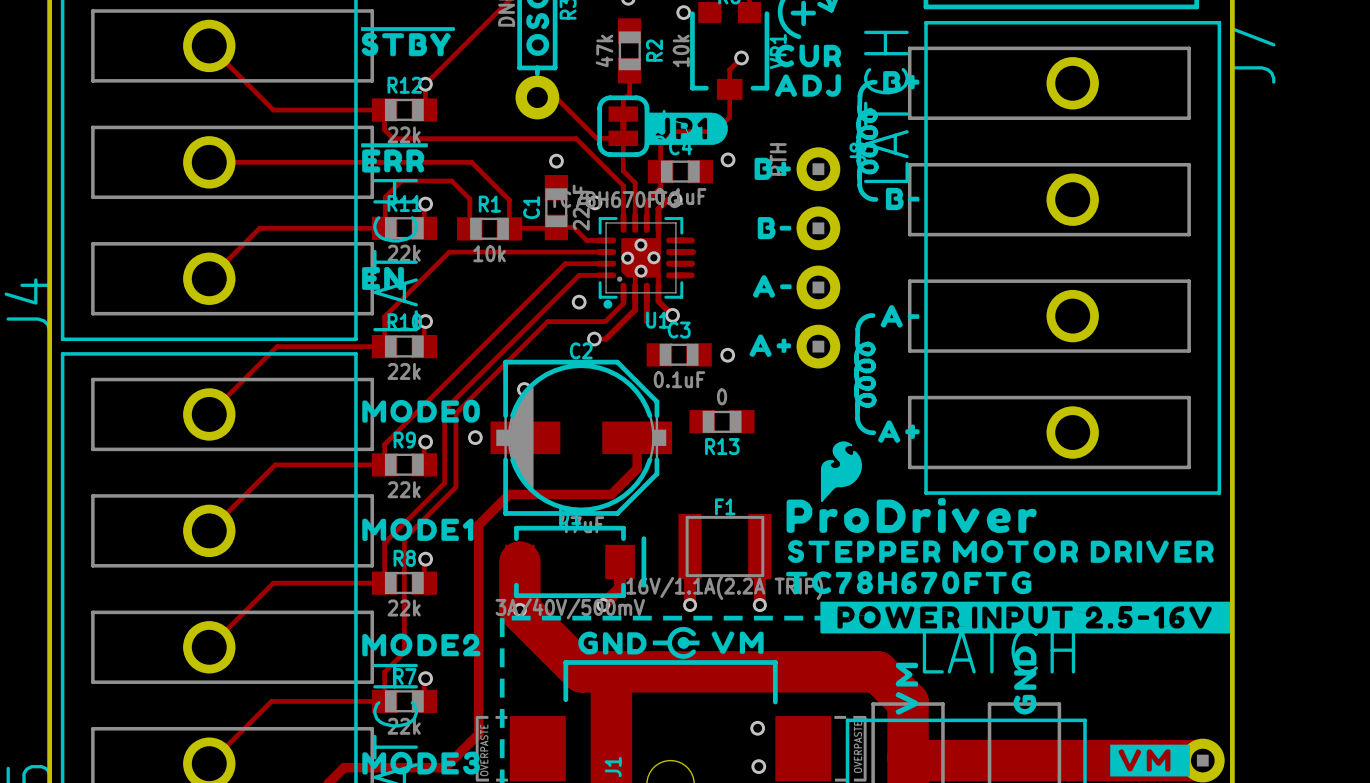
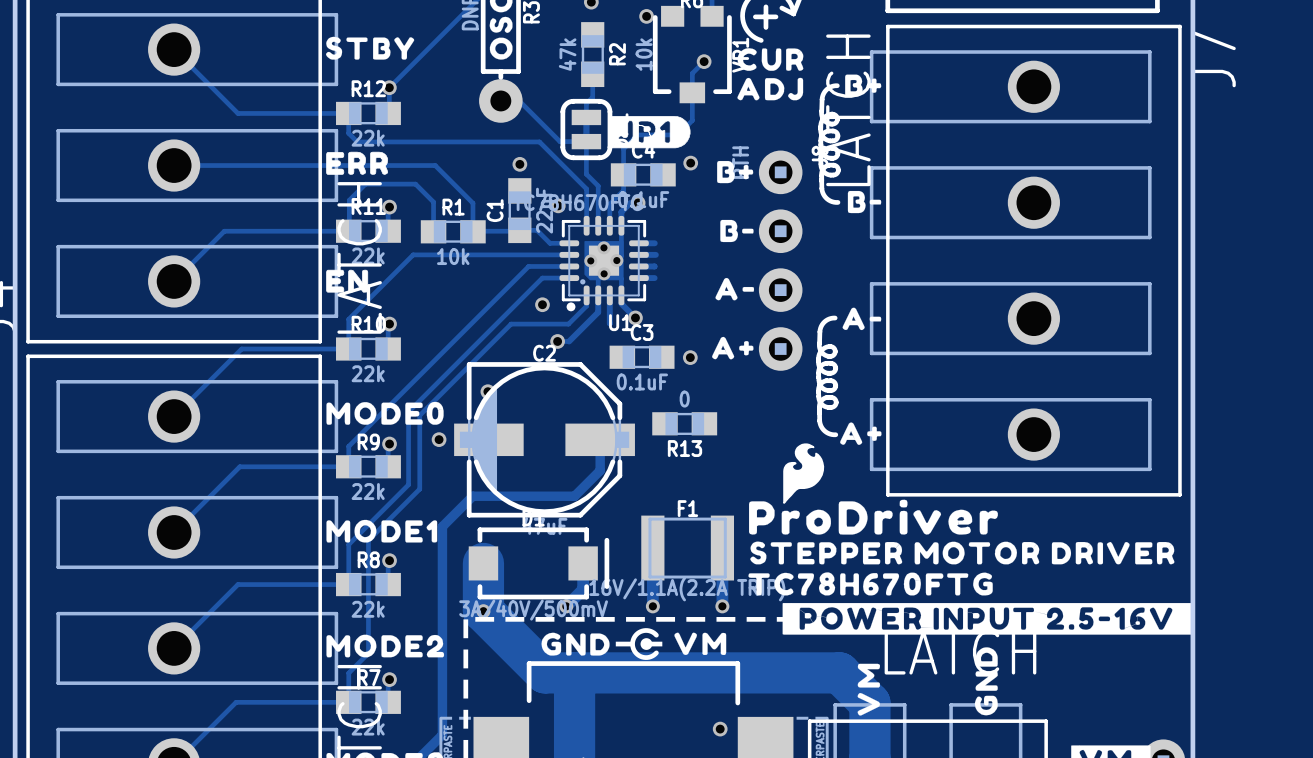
drawing shape: [360, 27, 455, 57] -> [325, 36, 415, 60]
drawing shape: [361, 143, 428, 173] -> [326, 151, 389, 175]

